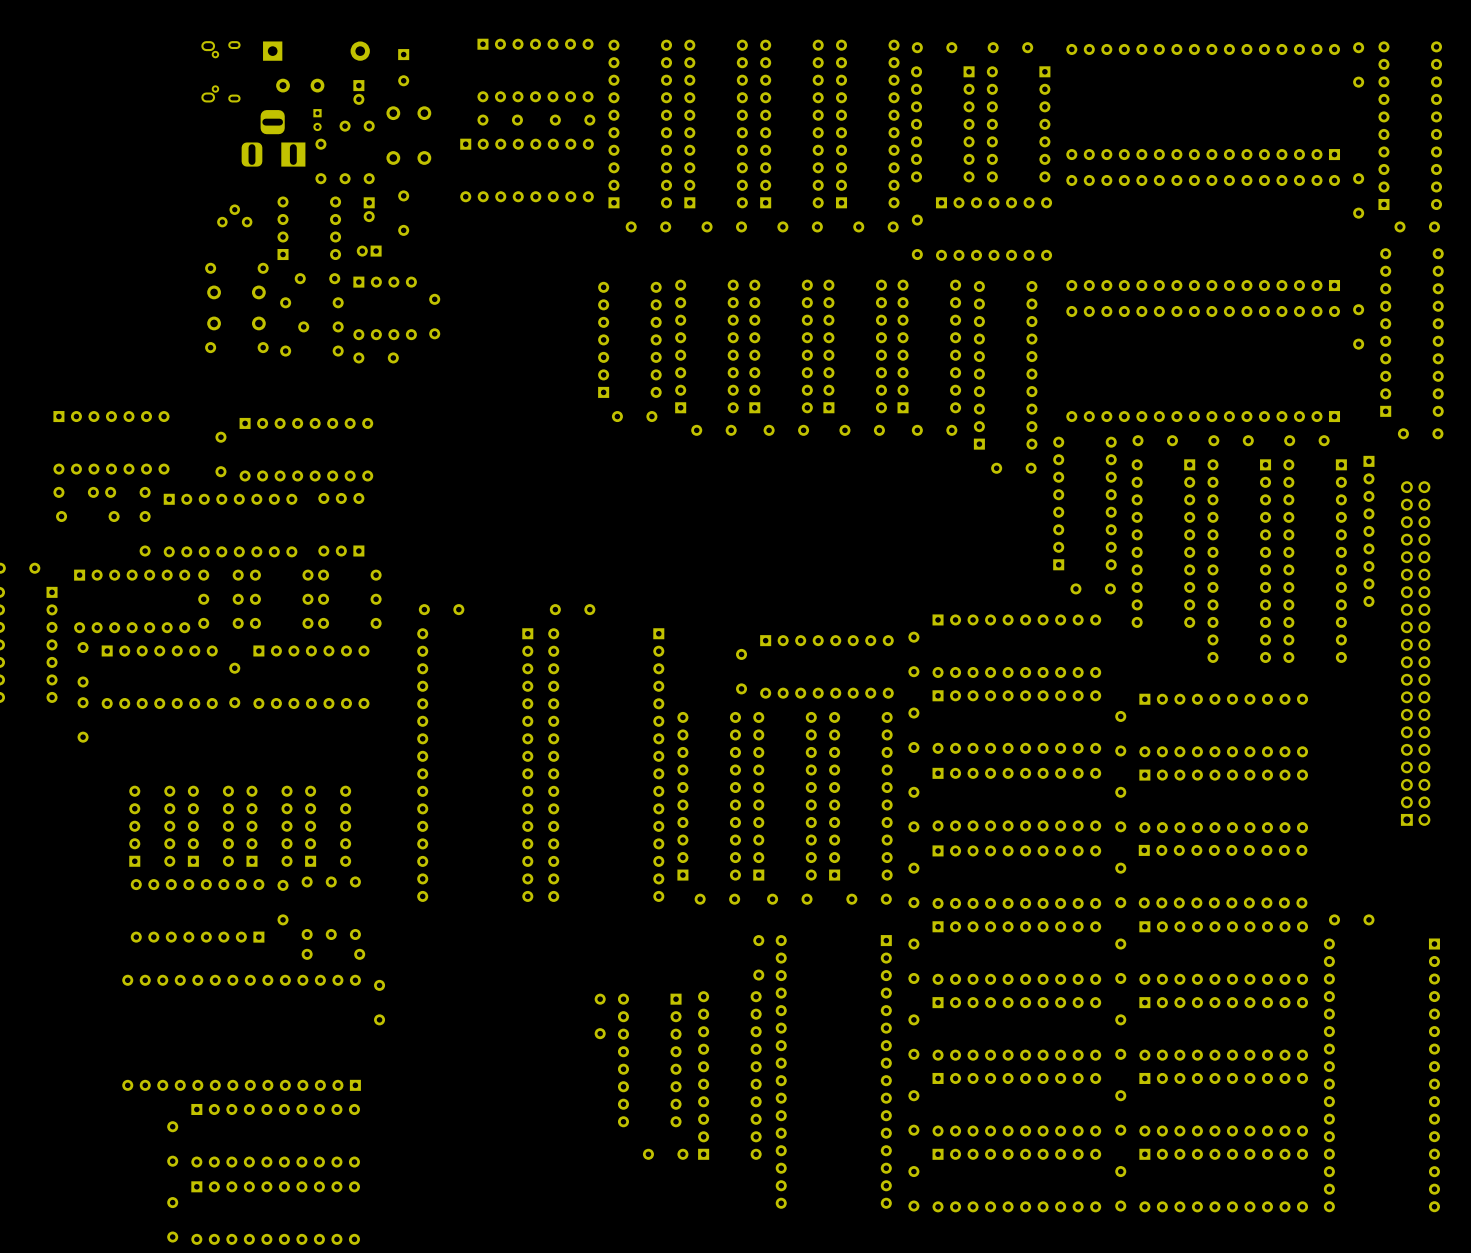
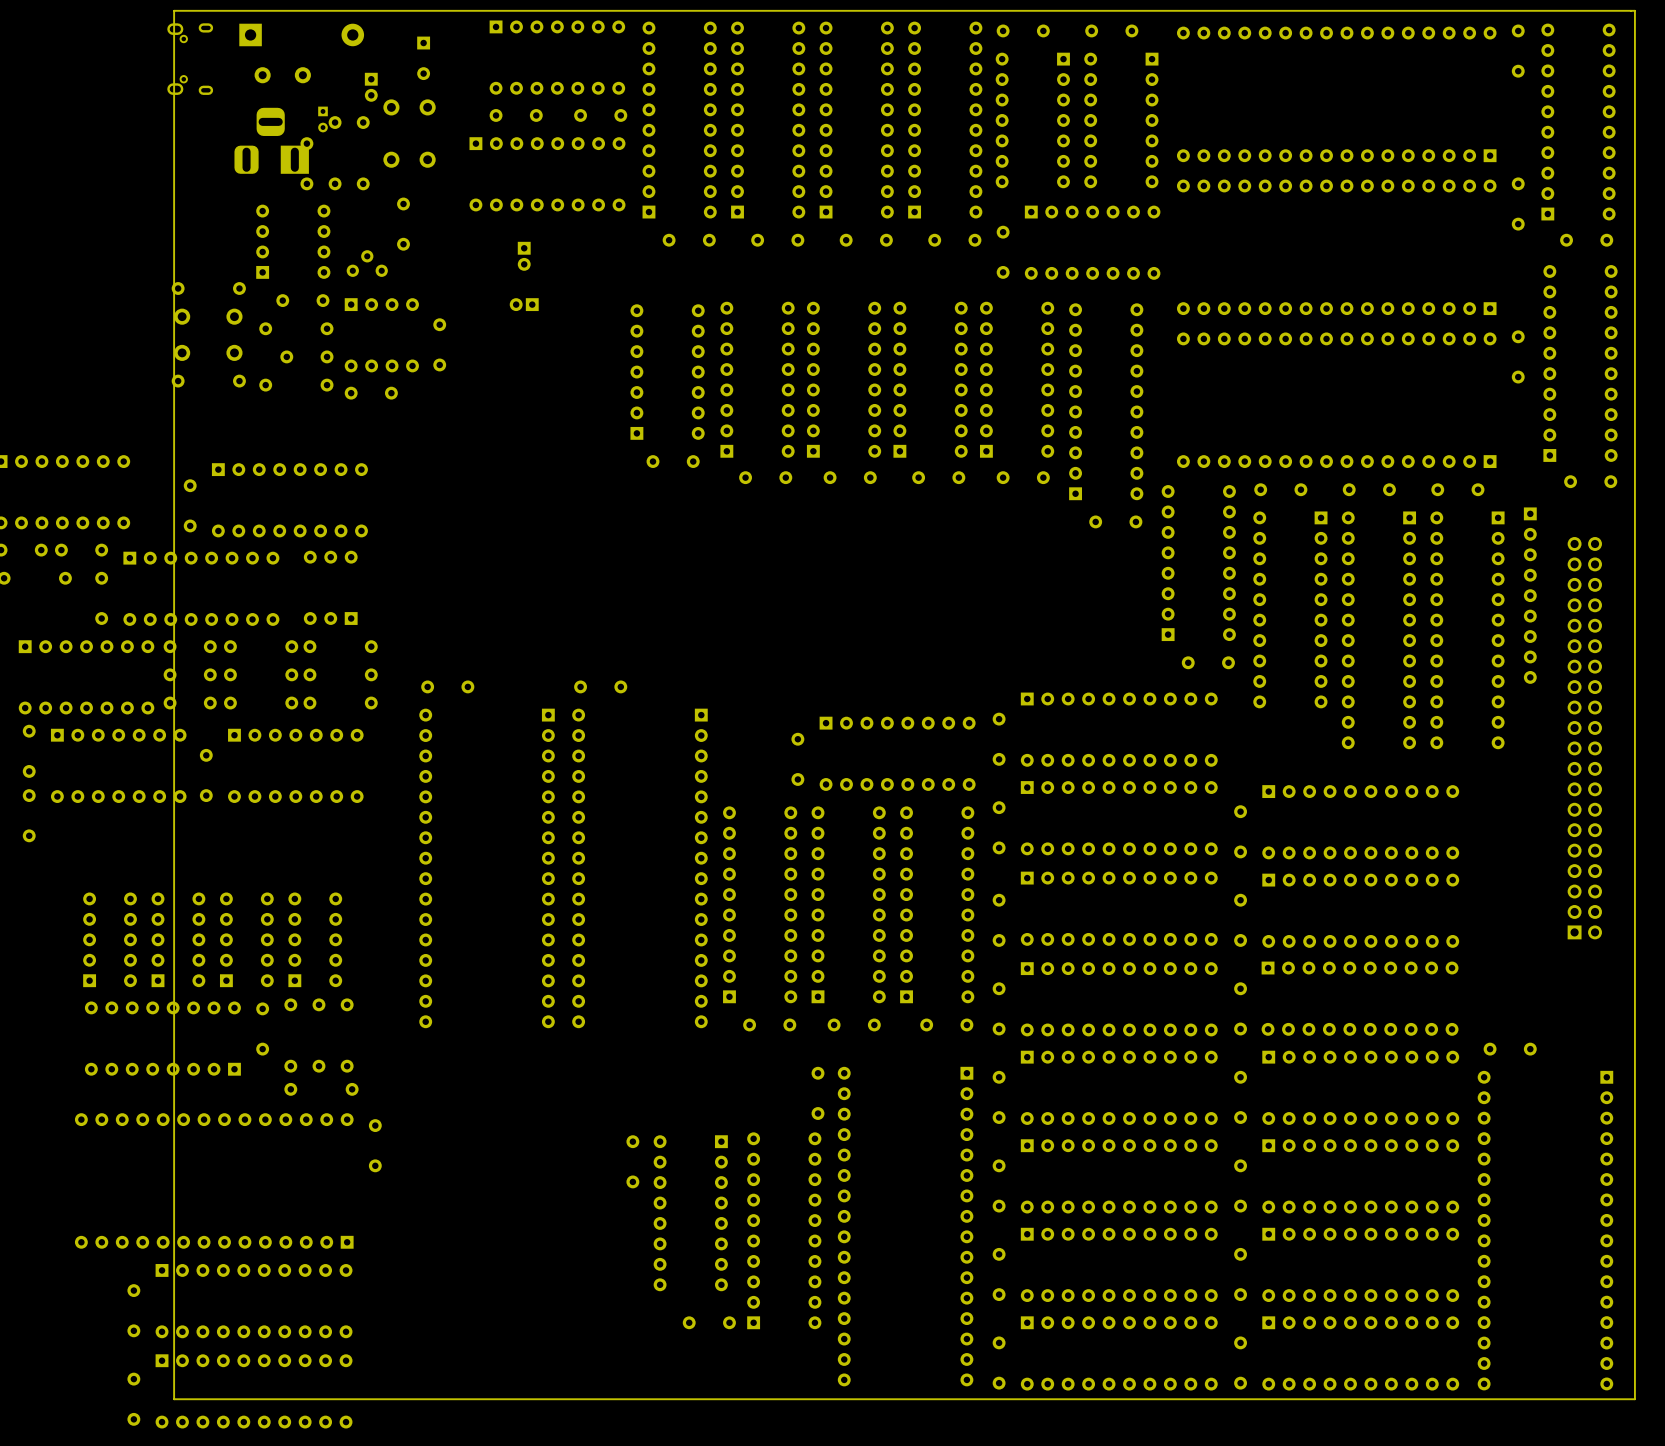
board edge: none -> (1634, 10) (174, 10) (174, 1399) (1634, 1399) (1634, 10)
part position: (403, 67) -> (423, 58)
part position: (358, 92) -> (371, 87)
part position: (317, 120) -> (323, 119)
part position: (273, 138) -> (271, 140)
part: (369, 209) -> none
part: (234, 215) -> none
part: none -> (524, 256)
part footprint: [356, 245, 382, 257] -> [346, 250, 388, 277]
part: none -> (524, 304)

